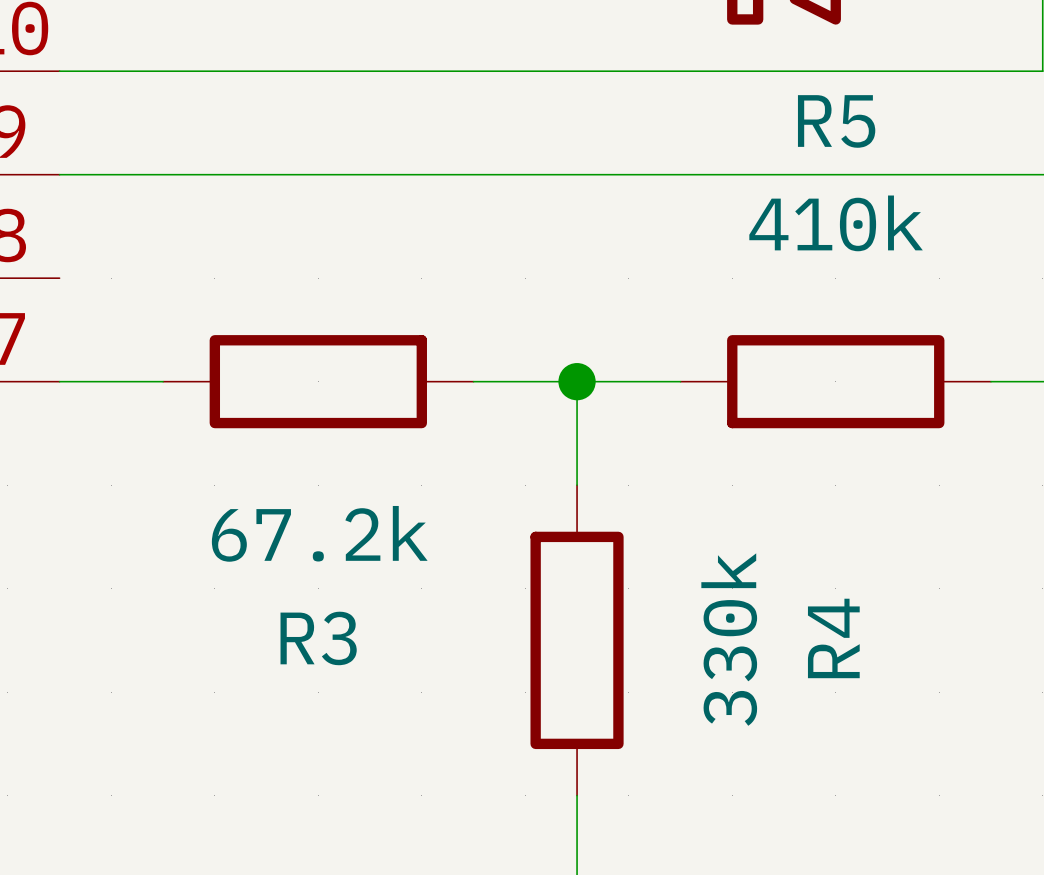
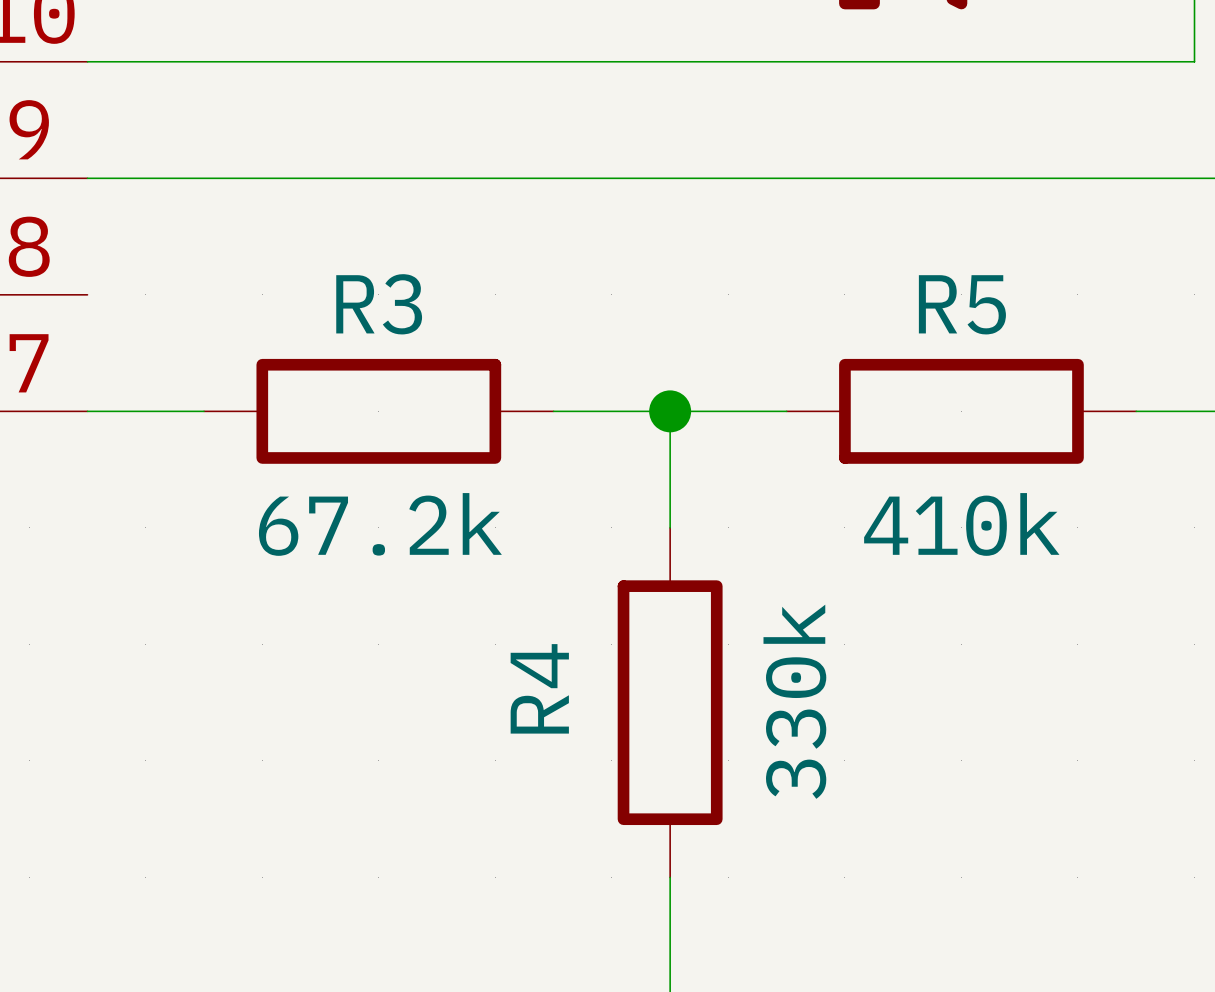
R5 name position: R5 (836, 121) -> R5 (962, 304)
R5 value position: 410k (836, 223) -> 410k (961, 524)
R3 value position: 67.2k (319, 533) -> 67.2k (380, 524)
R3 name position: R3 (318, 638) -> R3 (379, 304)
R4 name position: R4 (833, 638) -> R4 (539, 688)
R4 value position: 330k (729, 639) -> 330k (794, 701)

